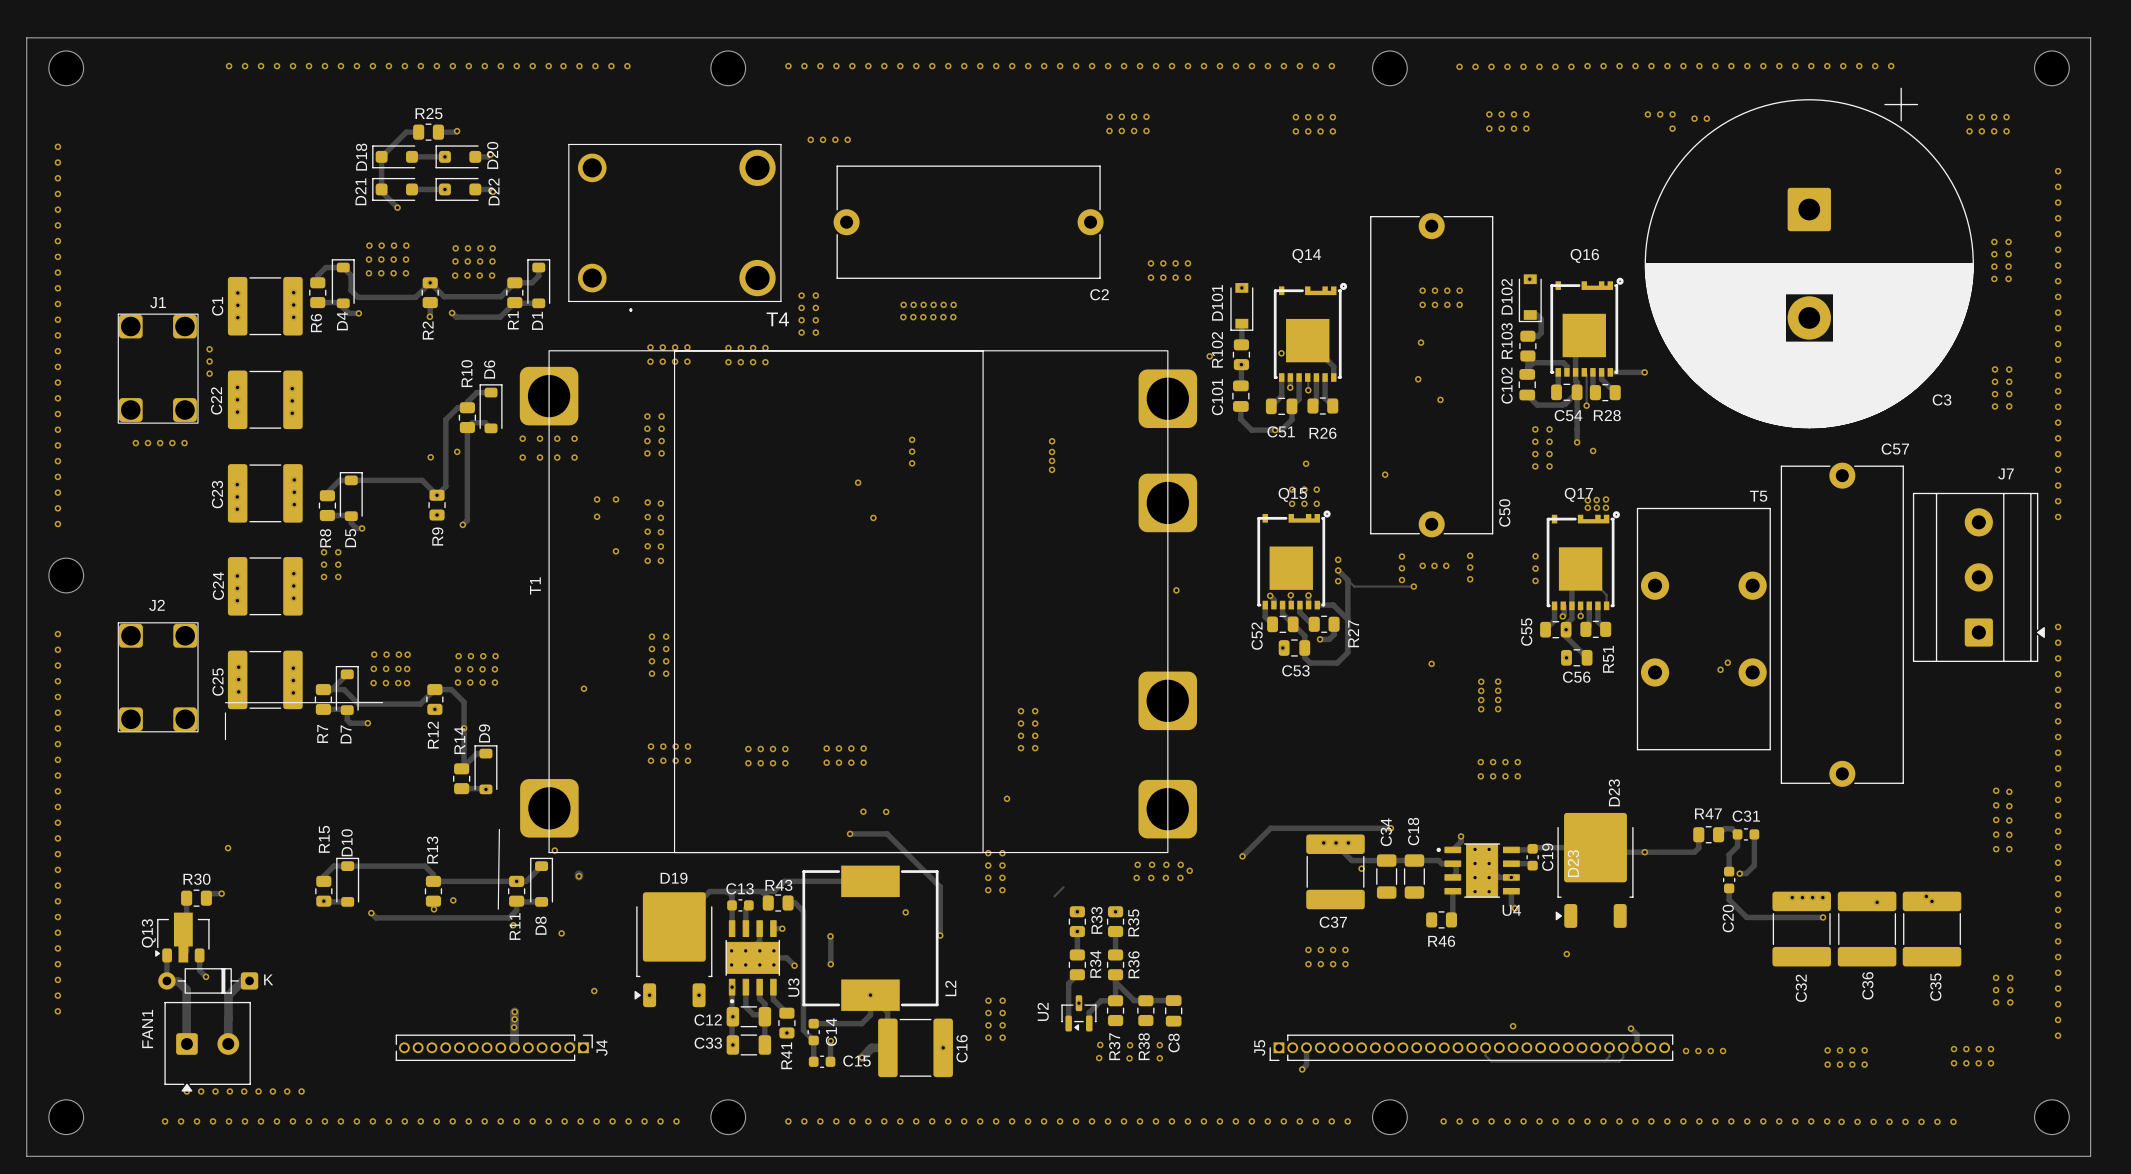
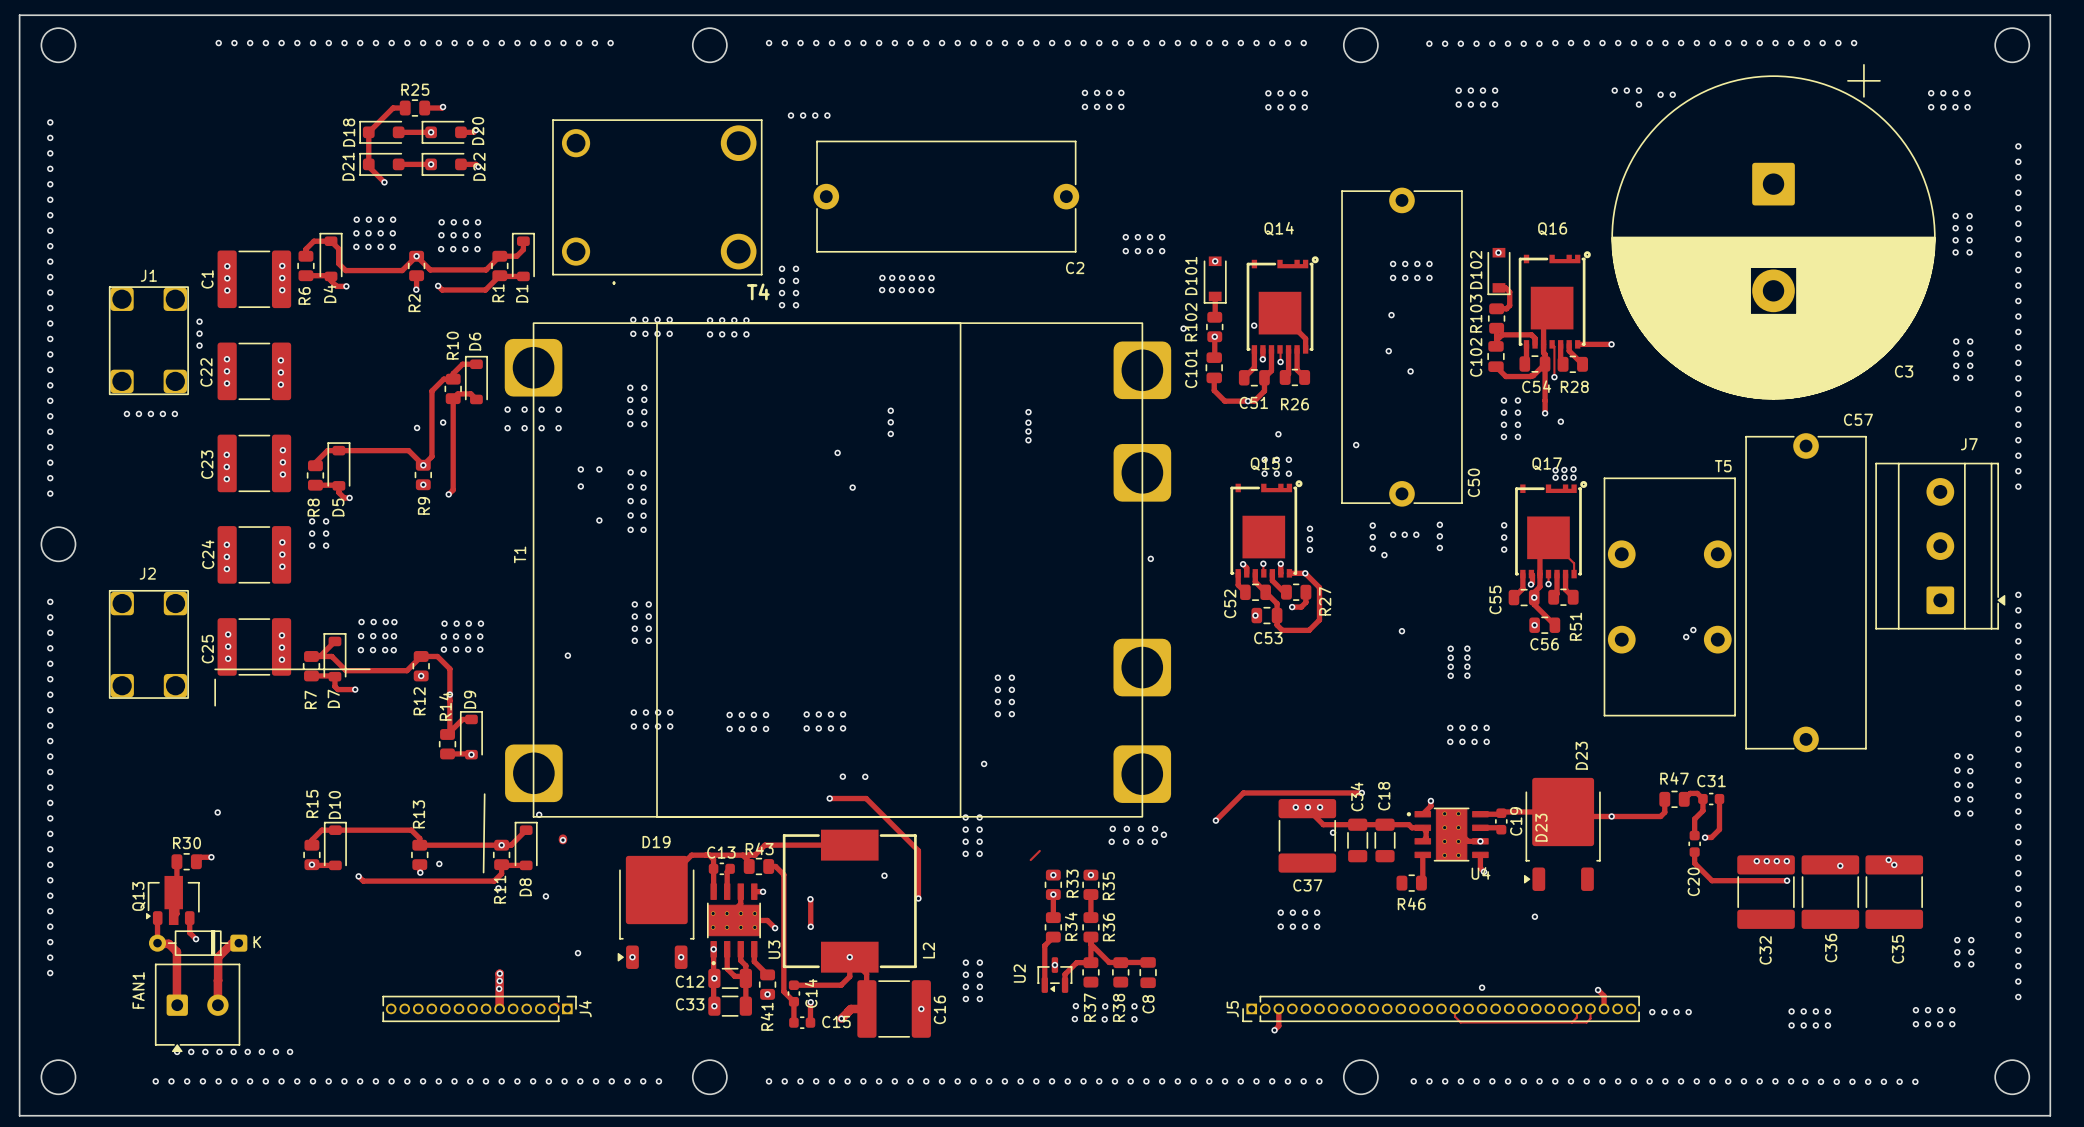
track: (1413, 586) (1354, 586) (1338, 570) (1347, 580) (1347, 619) -> none
via: none -> (1305, 573)

